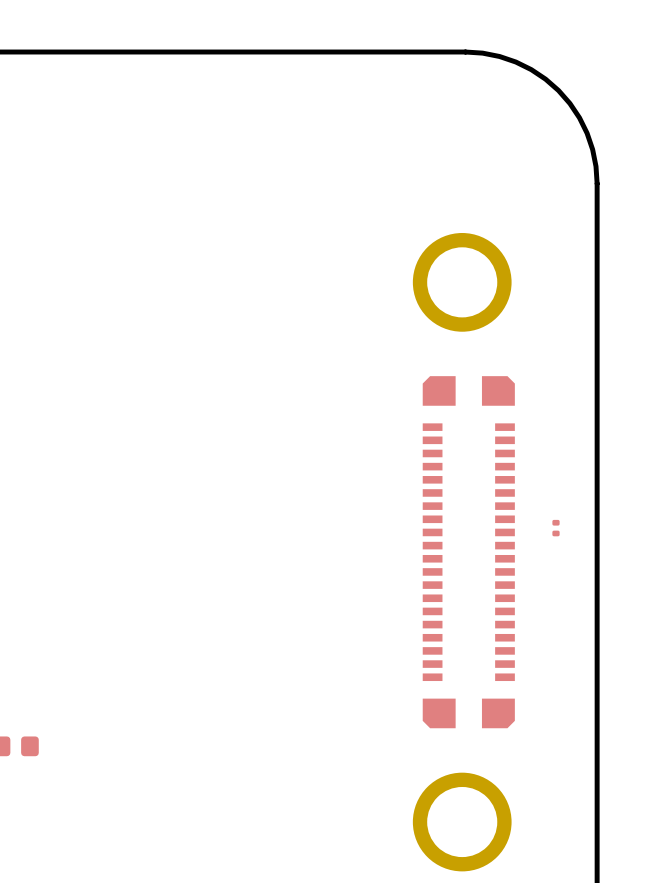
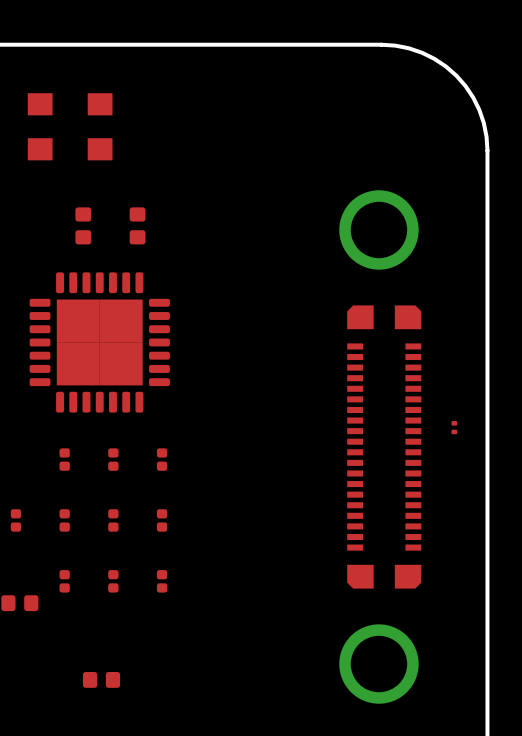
part: none -> (70, 126)
part: none -> (83, 225)
part: none -> (137, 225)
part: none -> (99, 342)
part: none -> (64, 459)
part: none -> (113, 459)
part: none -> (162, 459)
part: none -> (15, 520)
part: none -> (64, 520)
part: none -> (113, 520)
part: none -> (162, 520)
part: none -> (64, 581)
part: none -> (113, 581)
part: none -> (162, 581)
part: none -> (101, 679)

